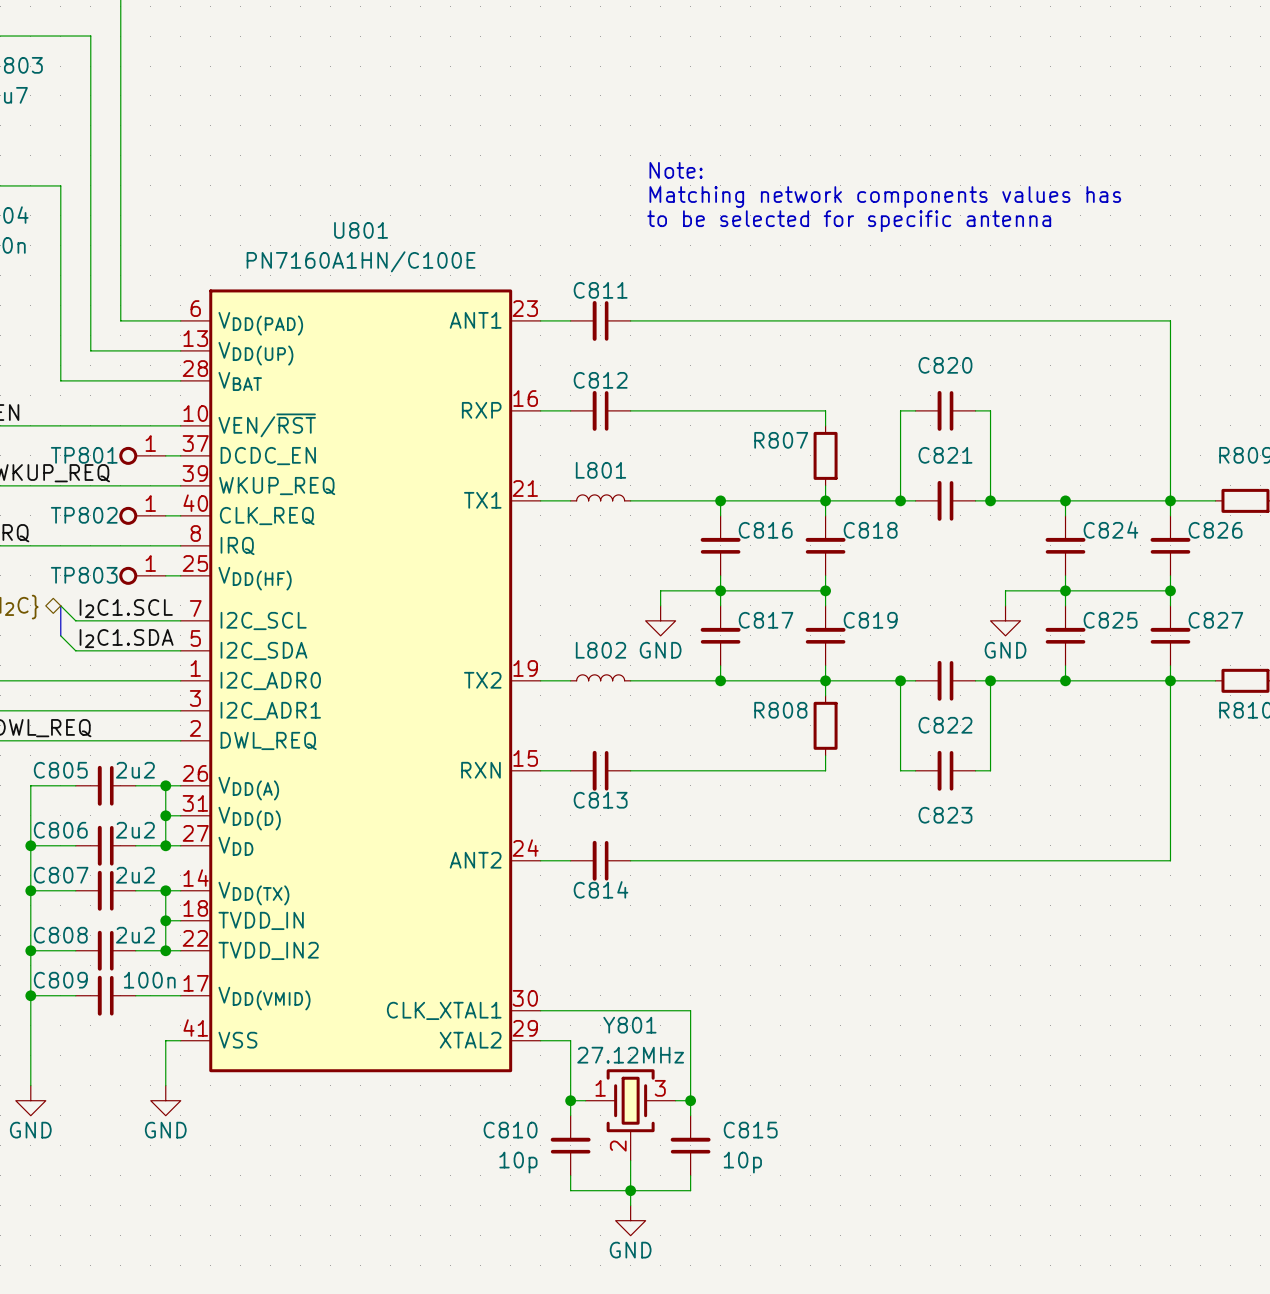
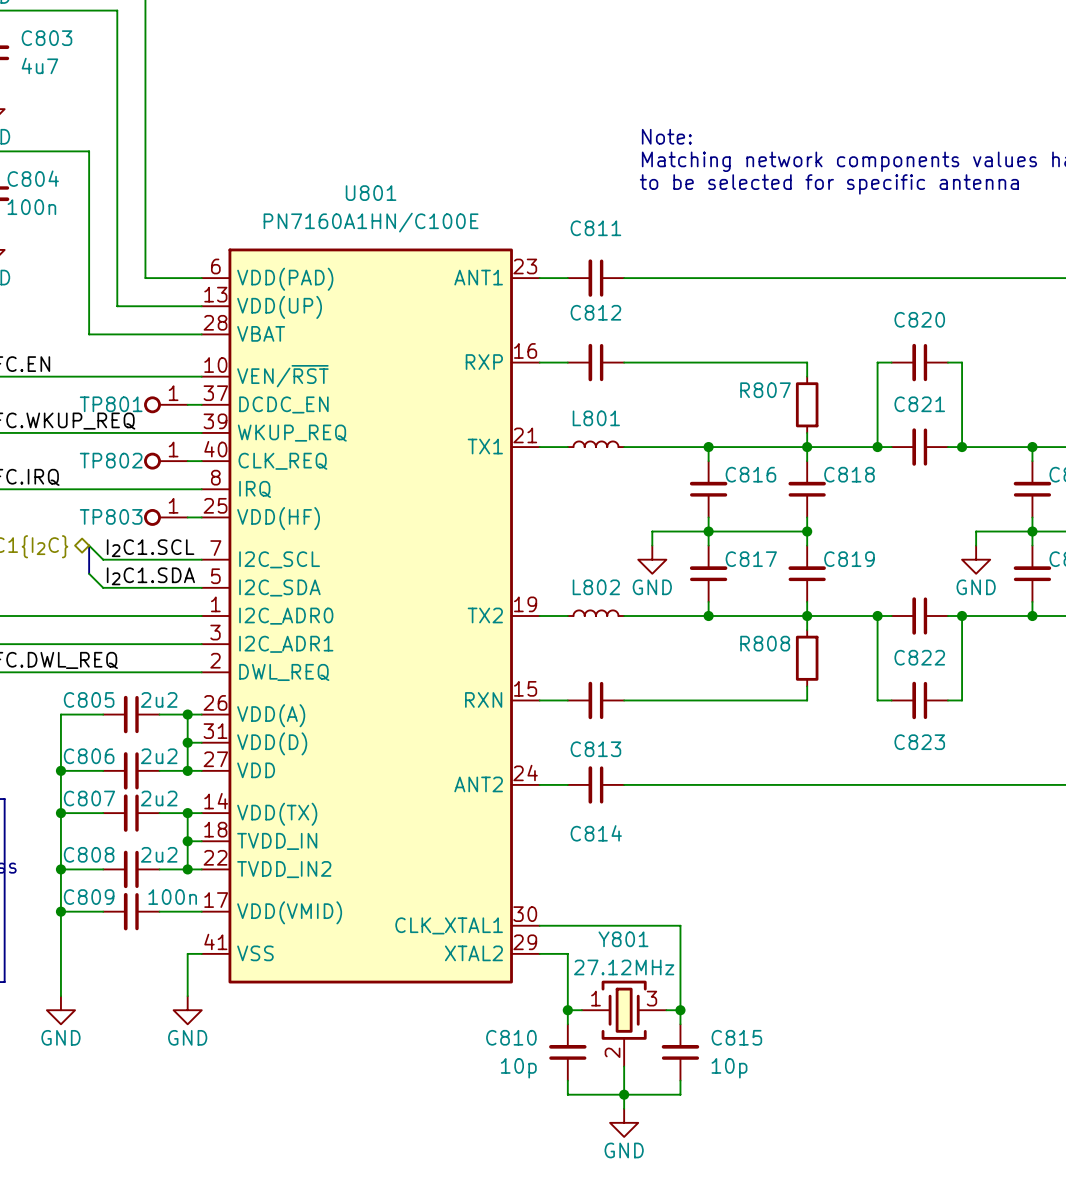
U801 symbol: [180, 289, 541, 1073] -> [201, 248, 540, 984]
C811 name position: C811 (600, 290) -> C811 (595, 228)
C812 name position: C812 (600, 380) -> C812 (595, 312)
C813 name position: C813 (600, 800) -> C813 (595, 749)
C814 name position: C814 (600, 889) -> C814 (596, 833)

